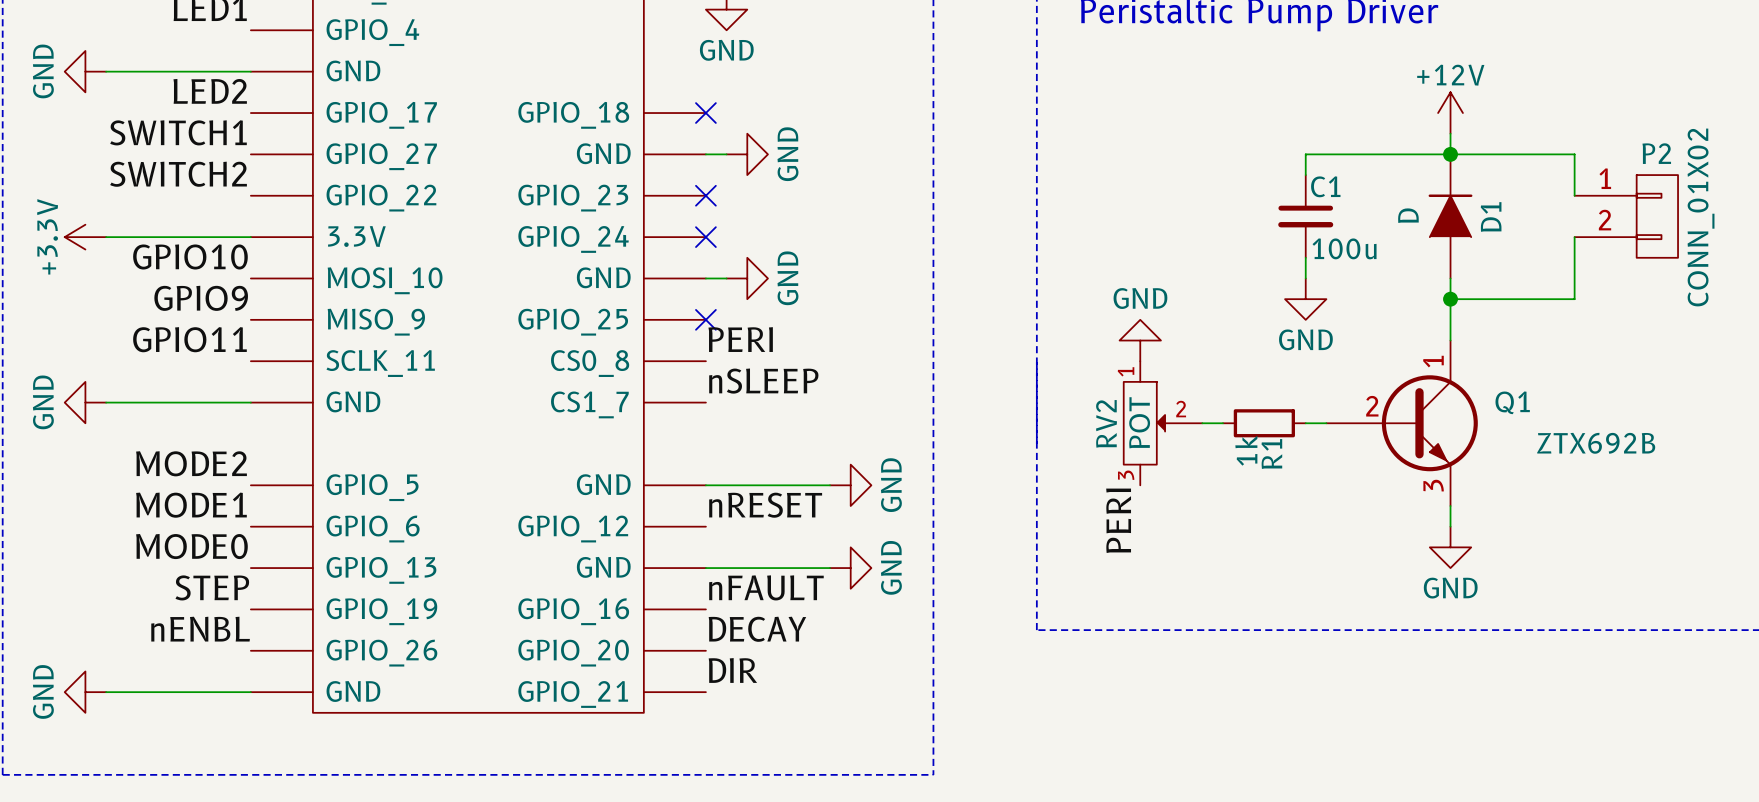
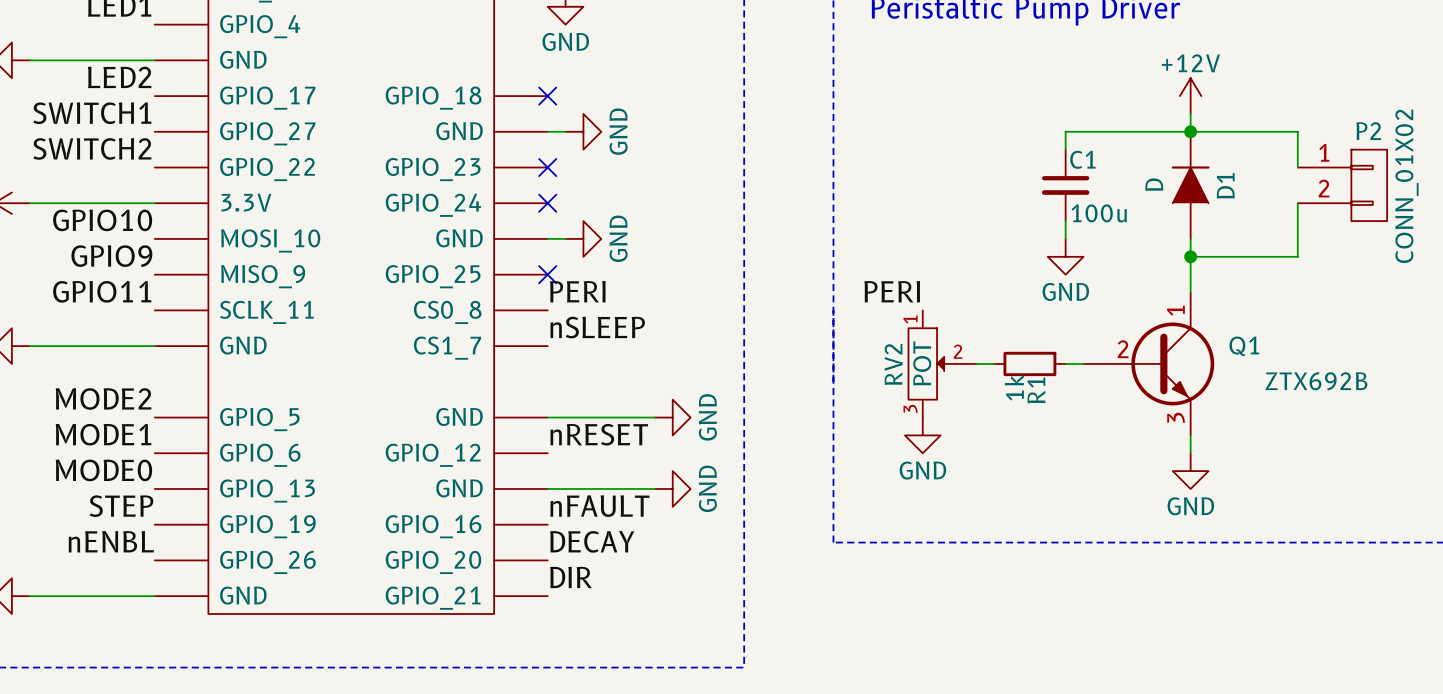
power symbol rotation: 0° (1140, 340) -> 180° (922, 435)
power symbol position: GND (1140, 340) -> GND (922, 435)
label rotation: 0° (1118, 520) -> 90° clockwise (892, 291)
label position: PERI (1118, 520) -> PERI (892, 291)

